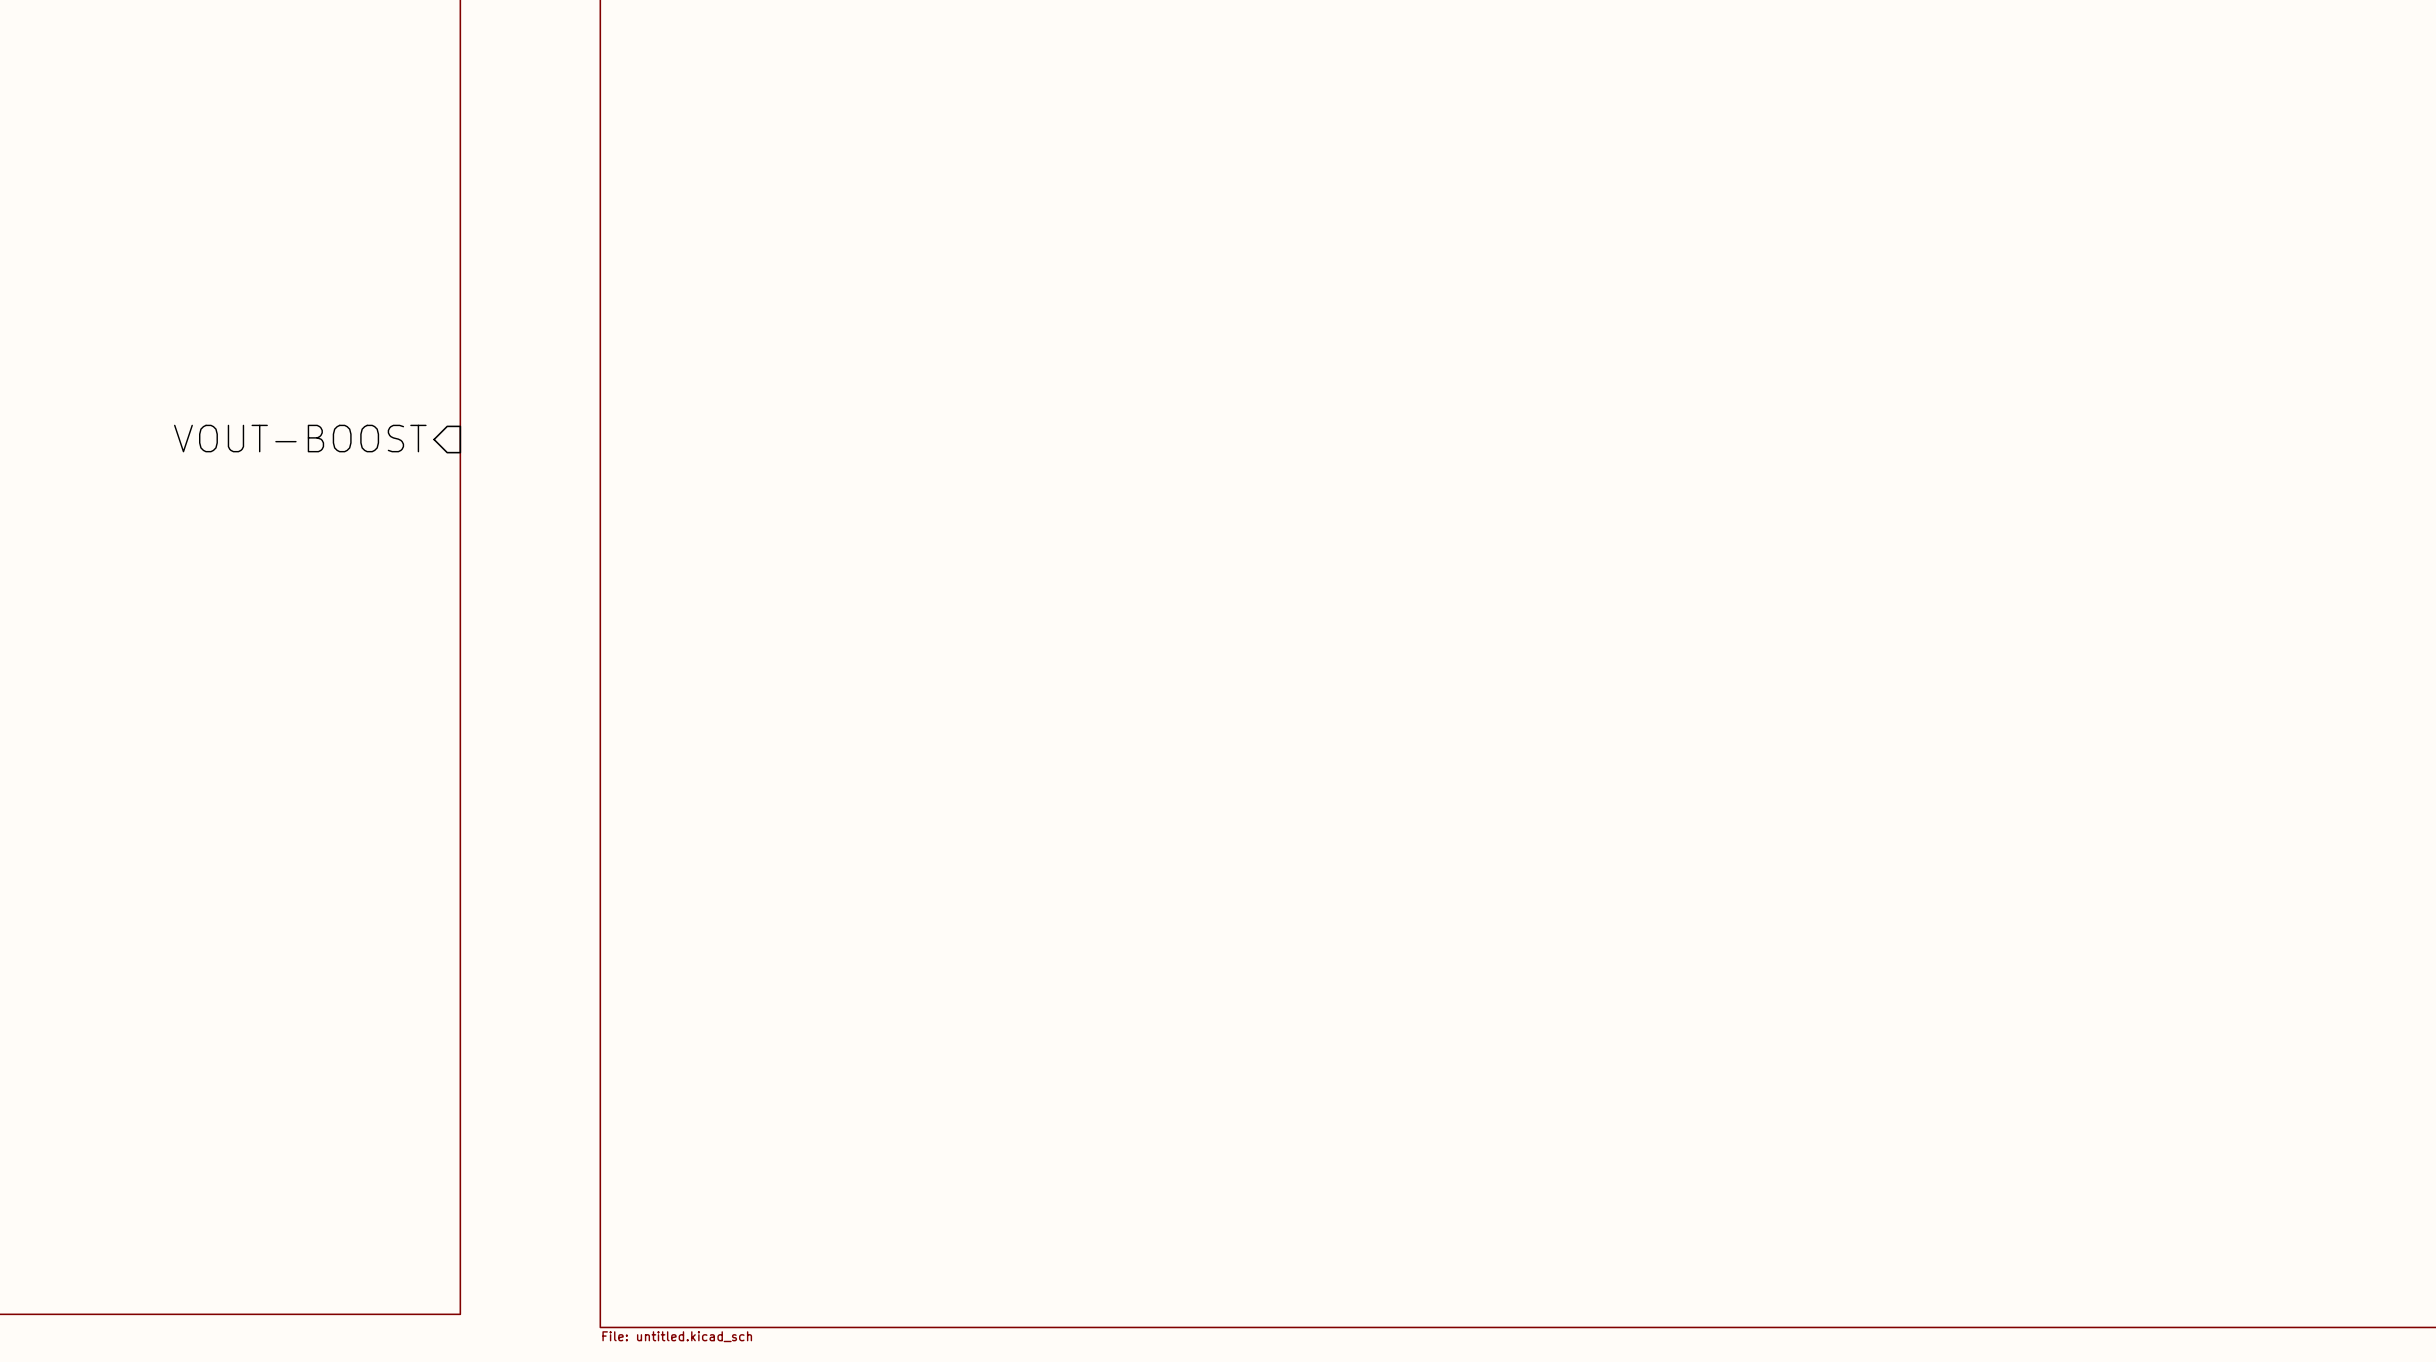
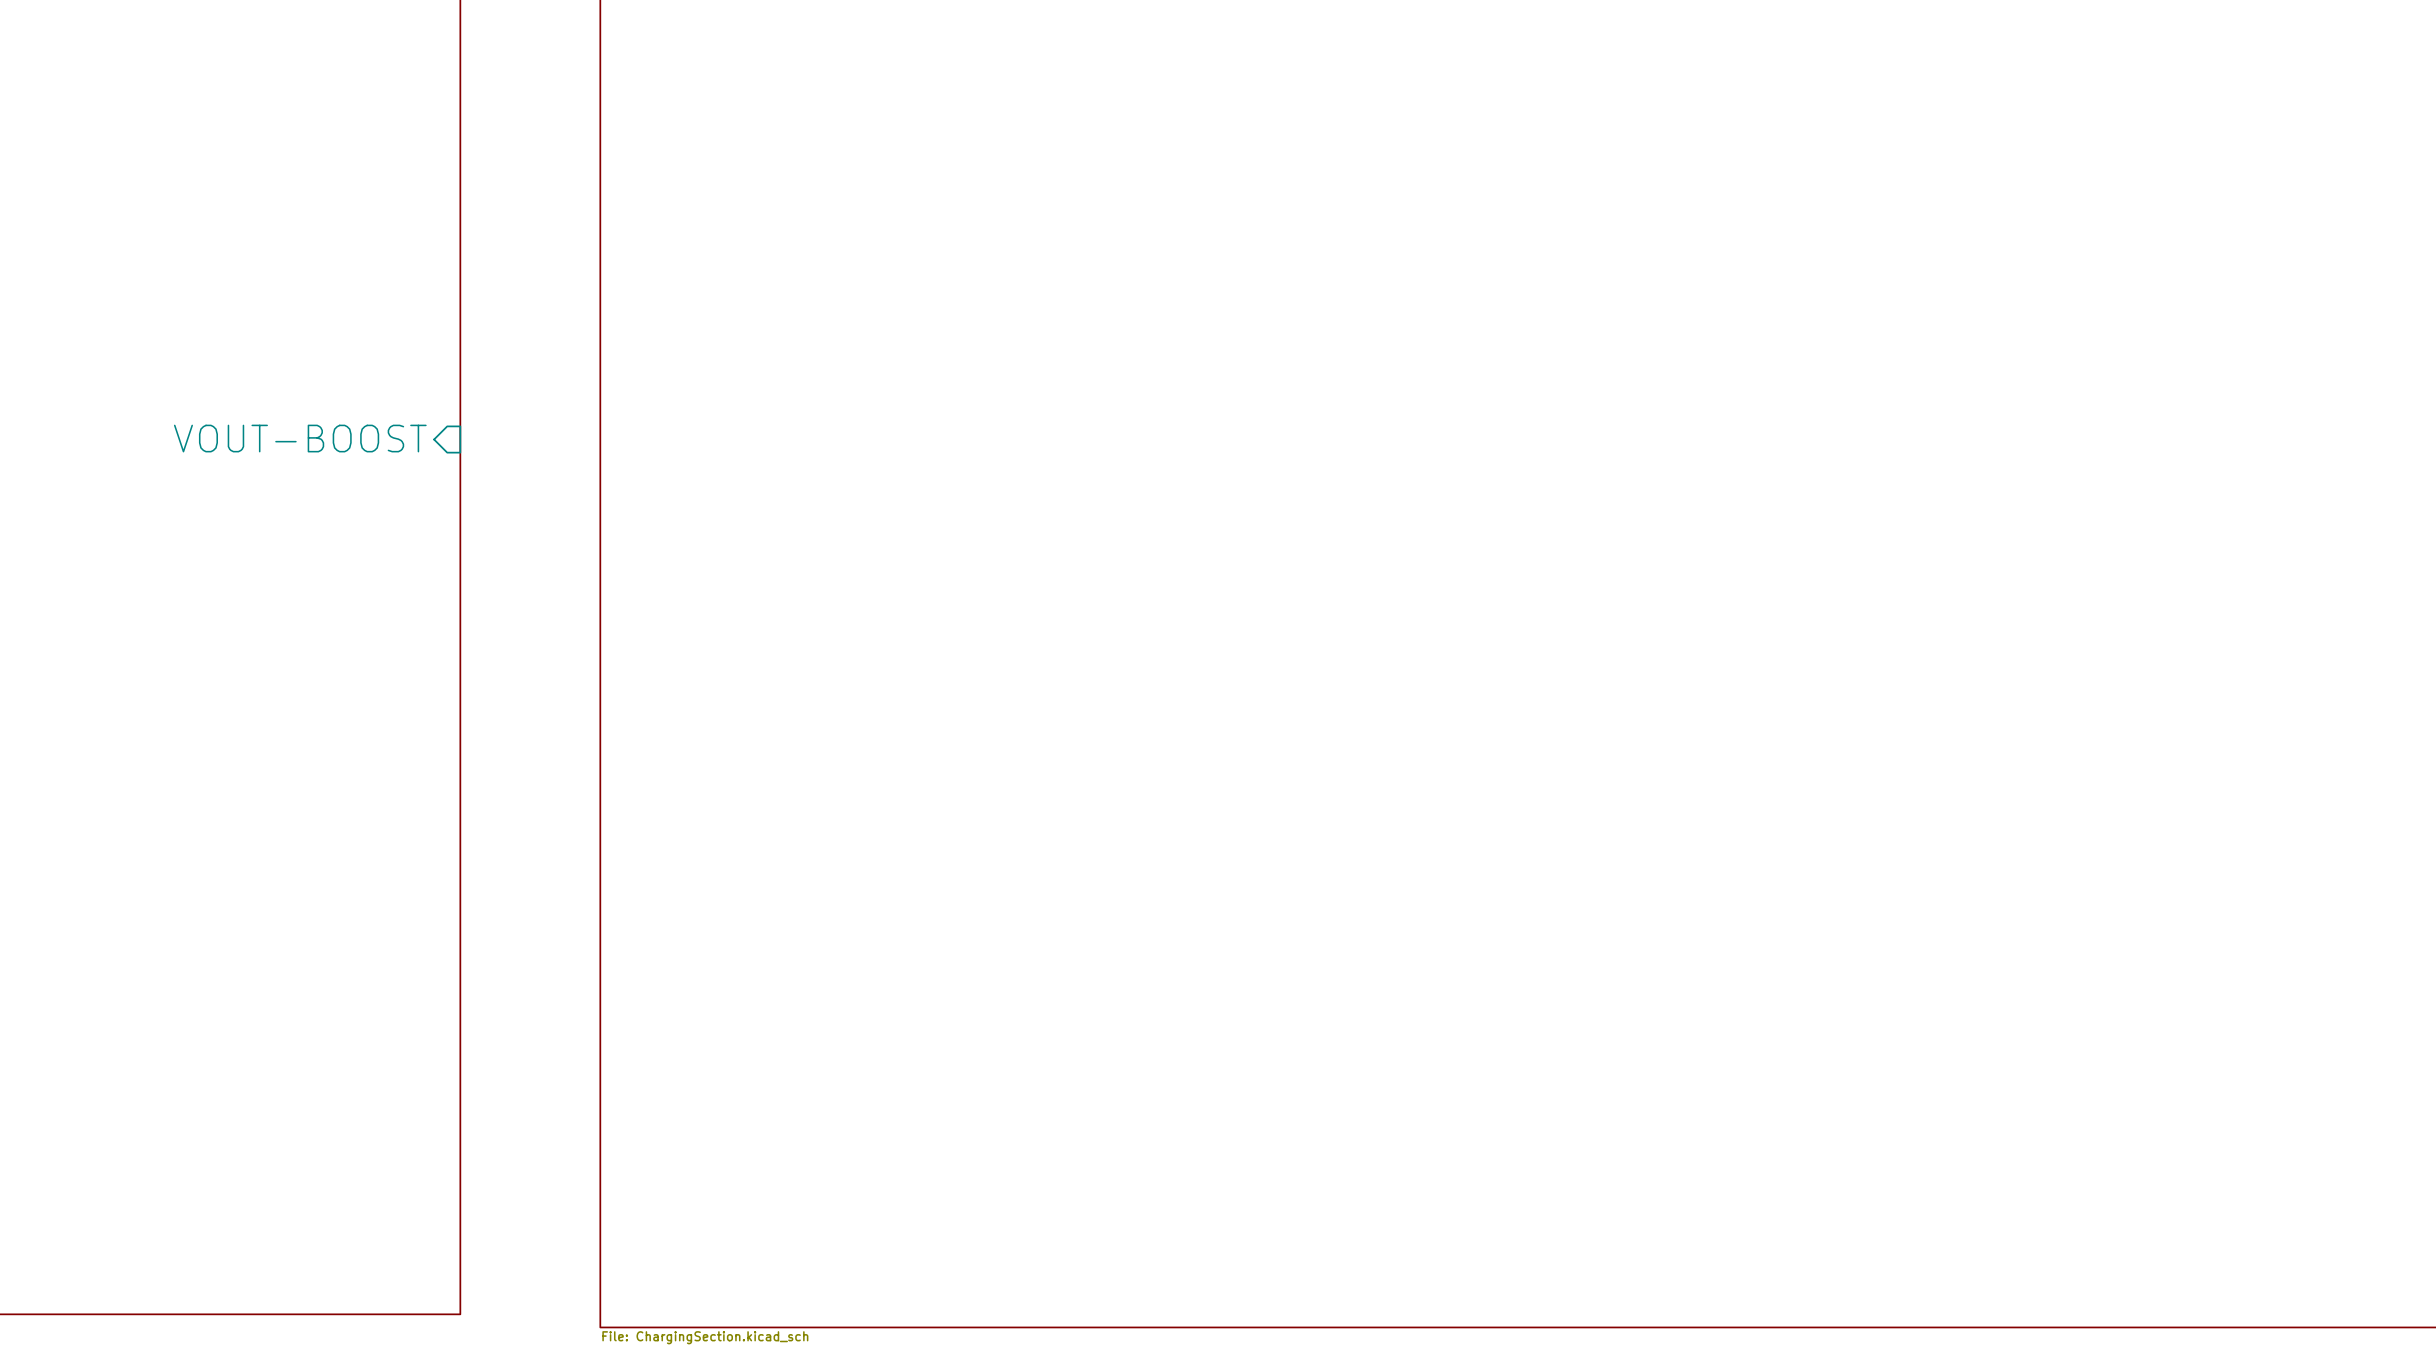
sheet value: File: untitled.kicad_sch (677, 1336) -> File: ChargingSection.kicad_sch (705, 1337)

